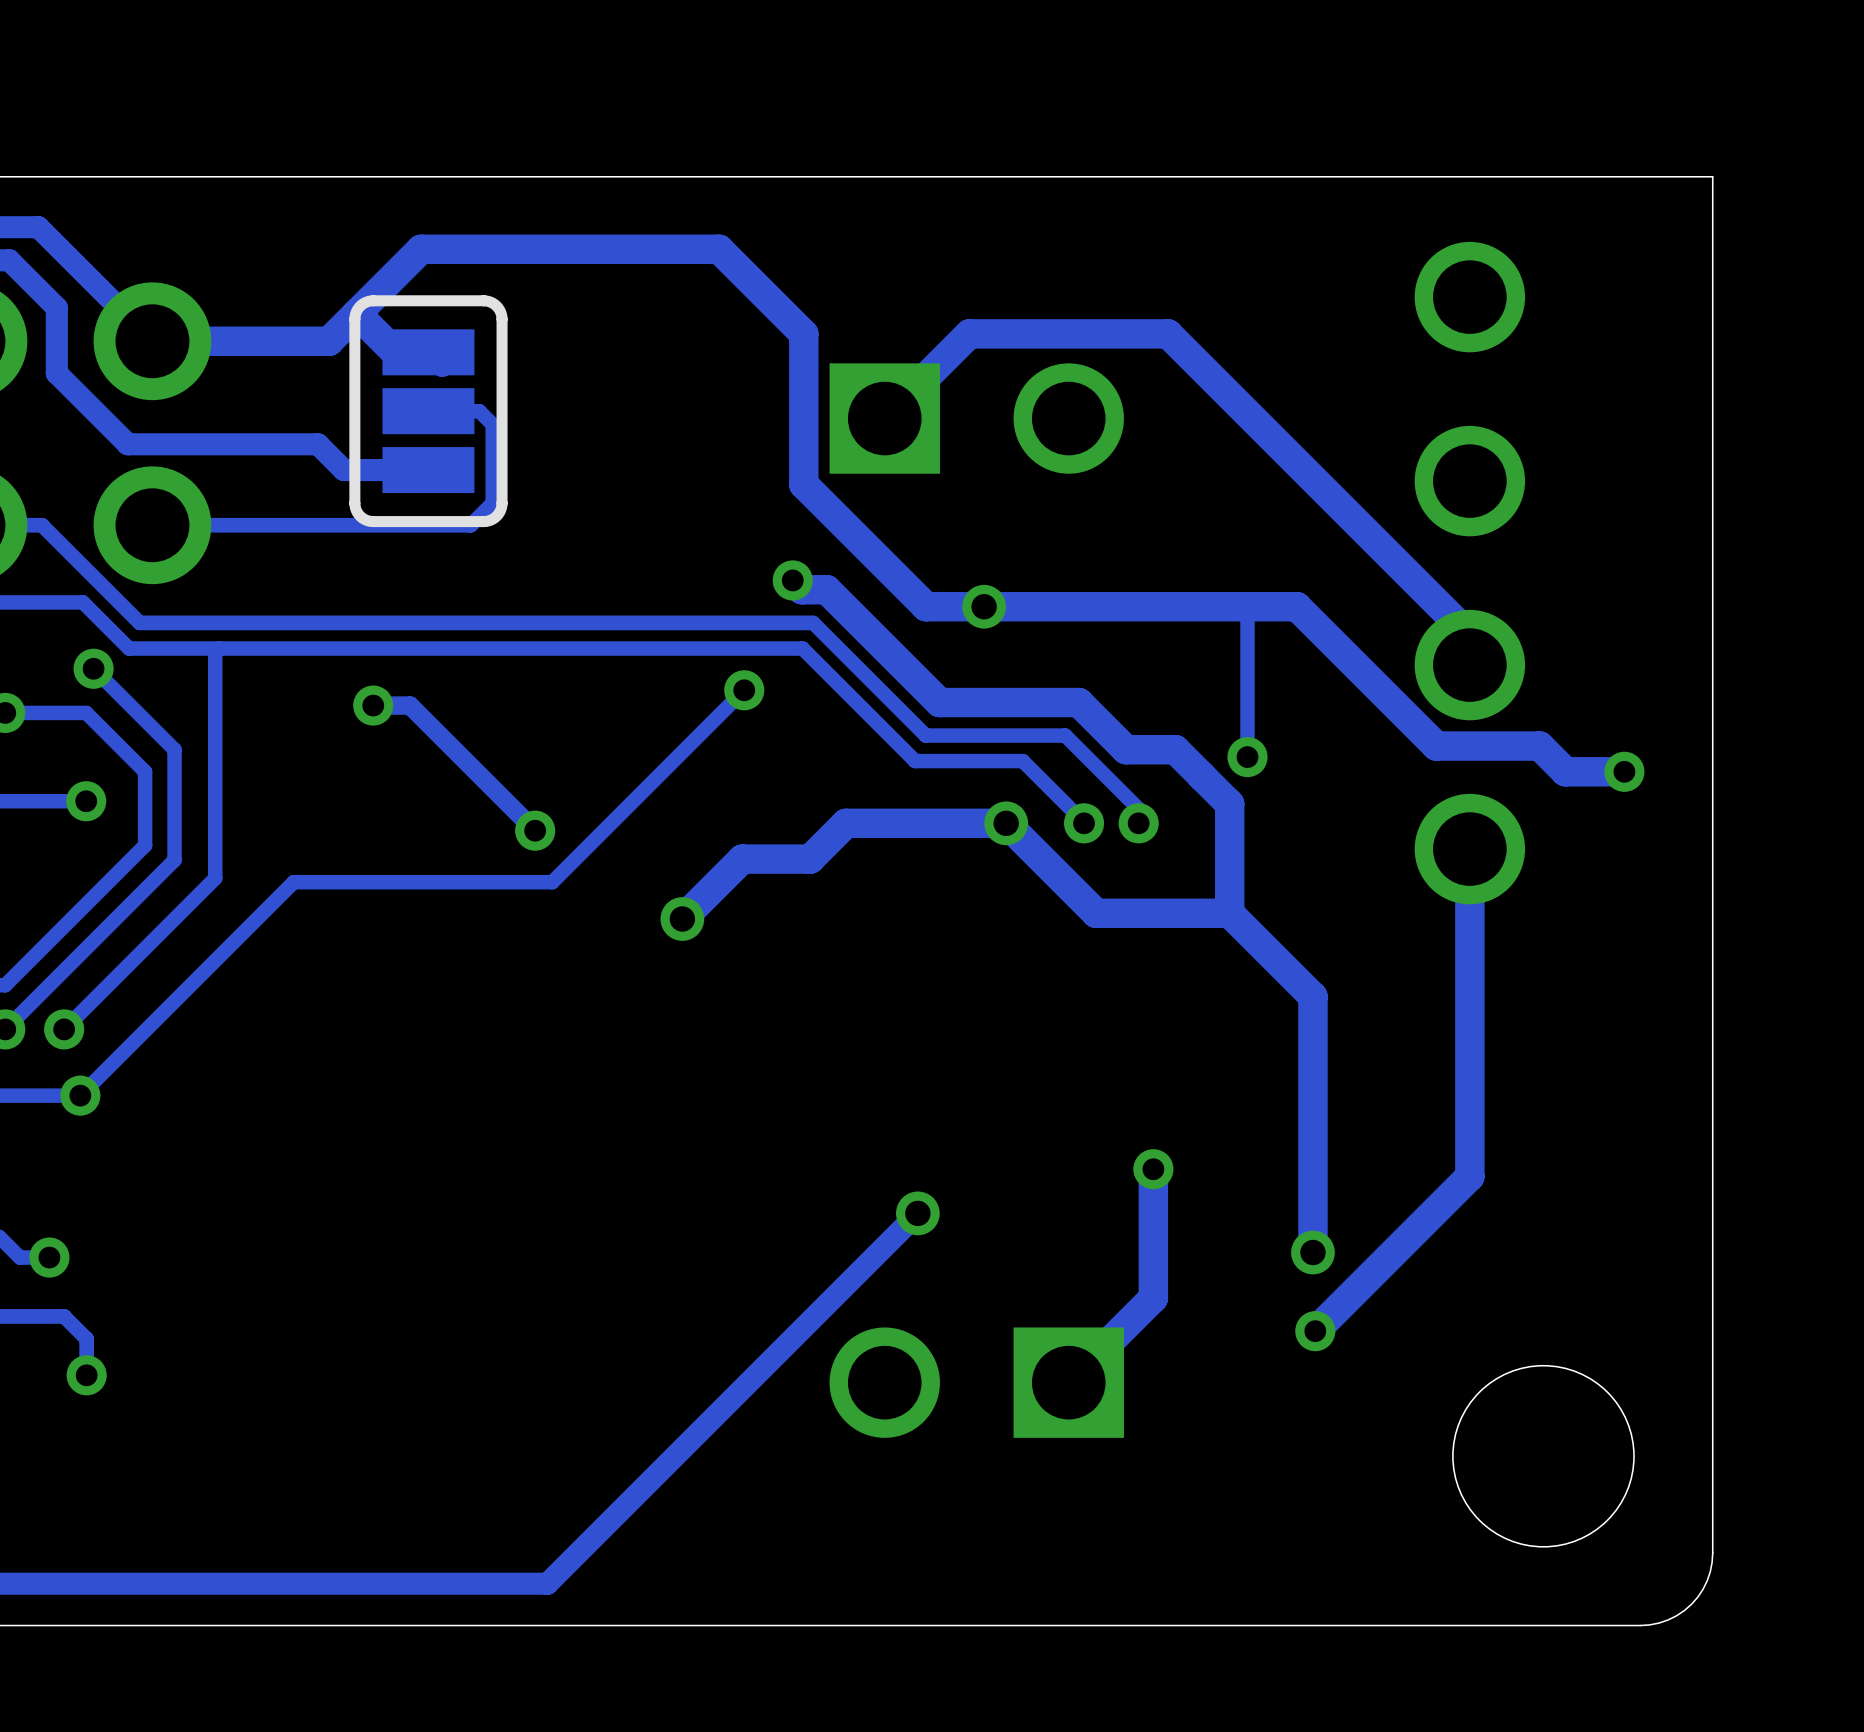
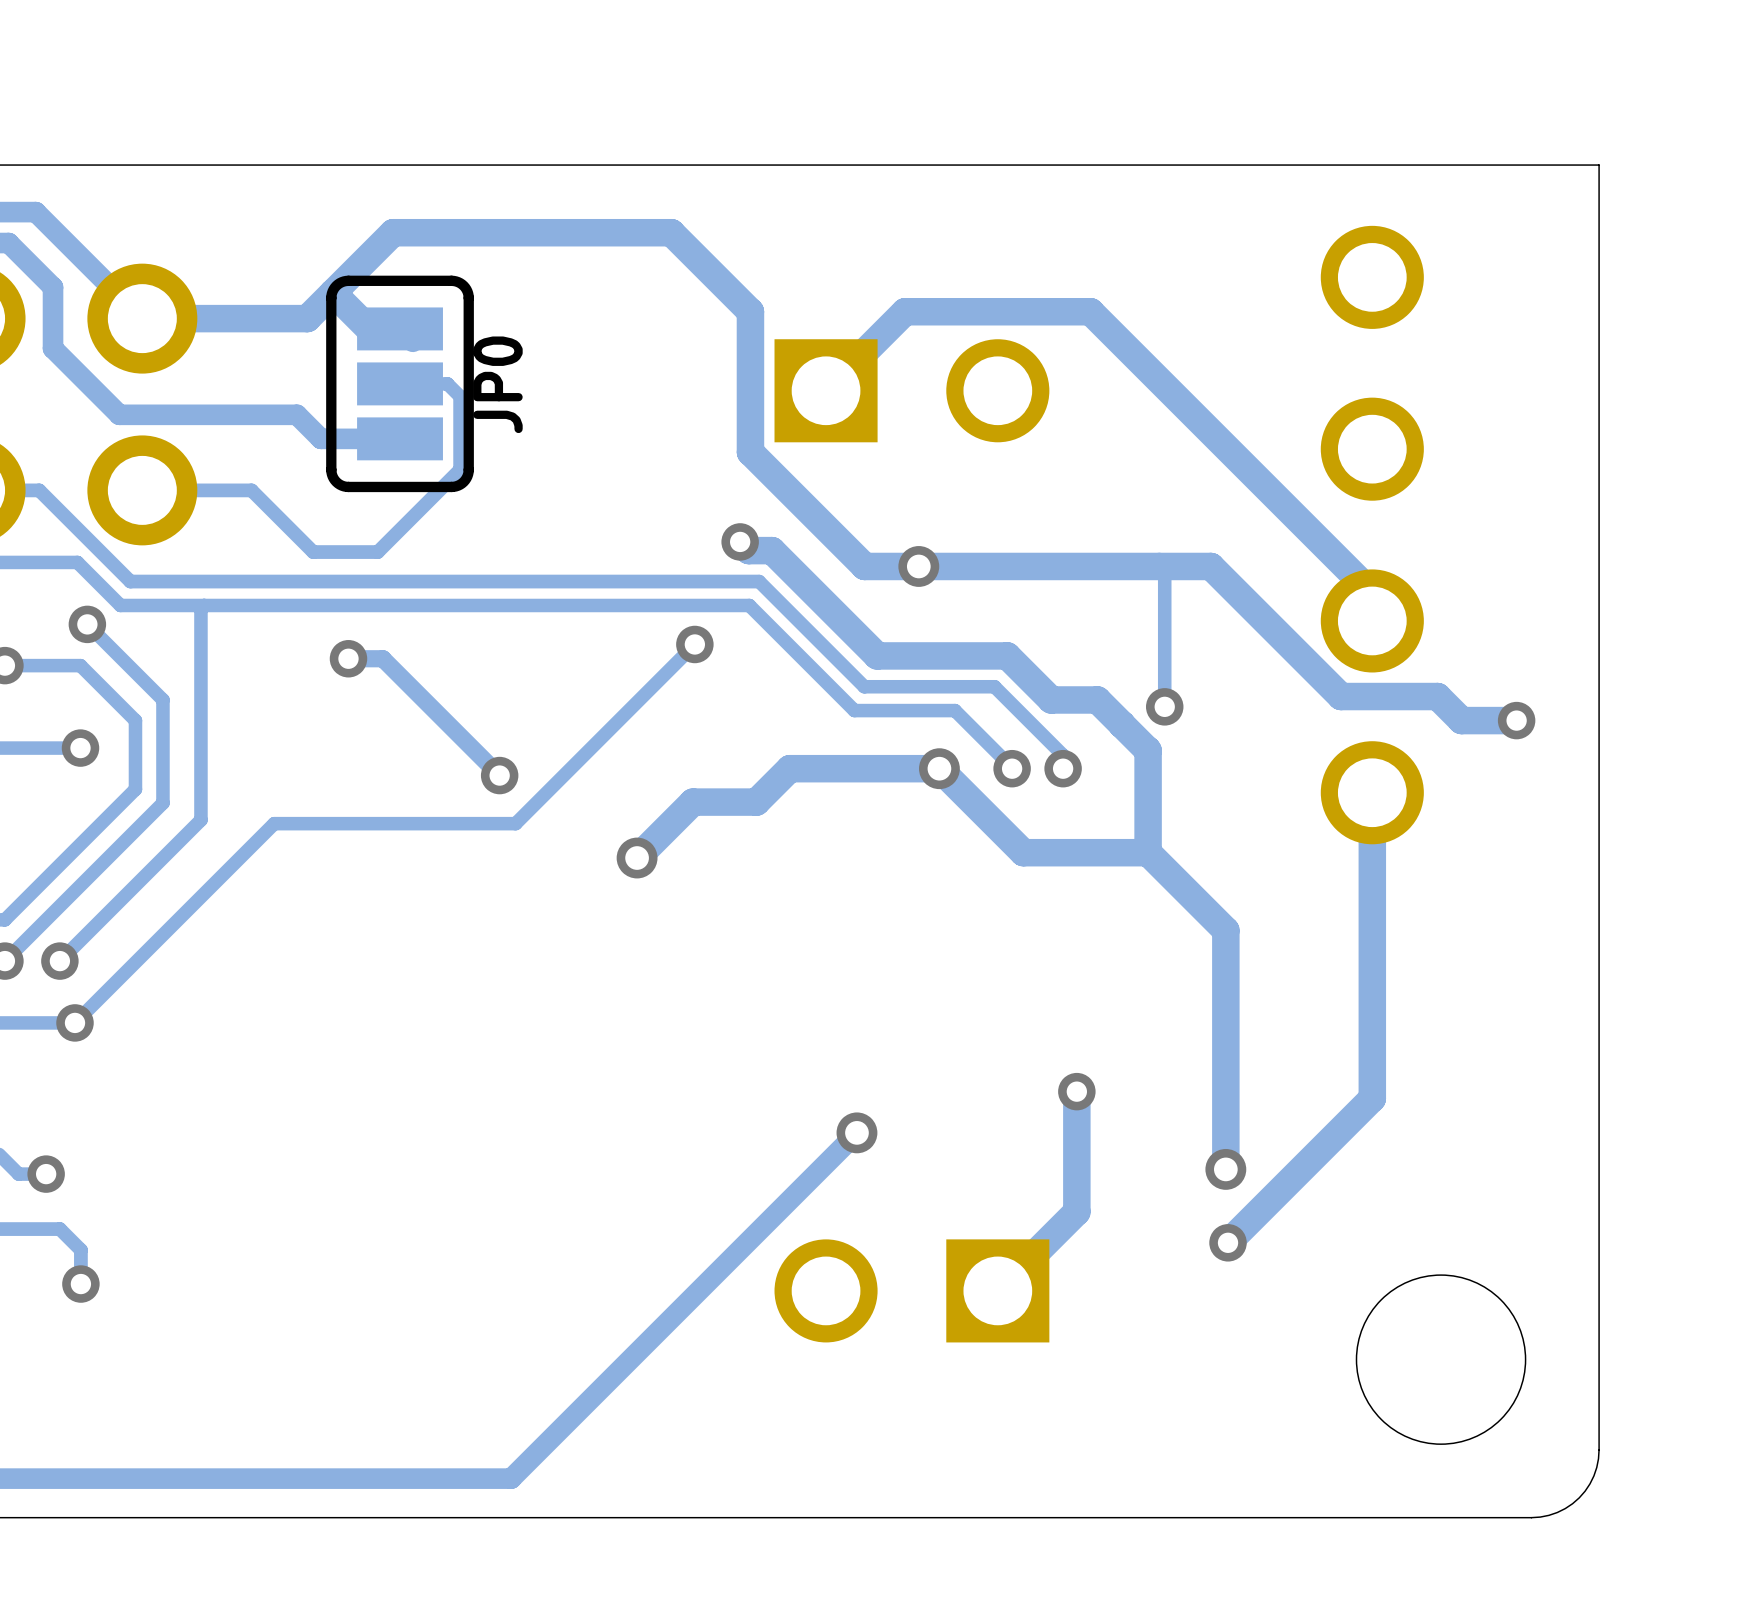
JP0 name: none -> JP0 (497, 384)
track: (470, 525) (269, 525) -> (439, 490) (377, 552) (313, 552) (251, 490)

